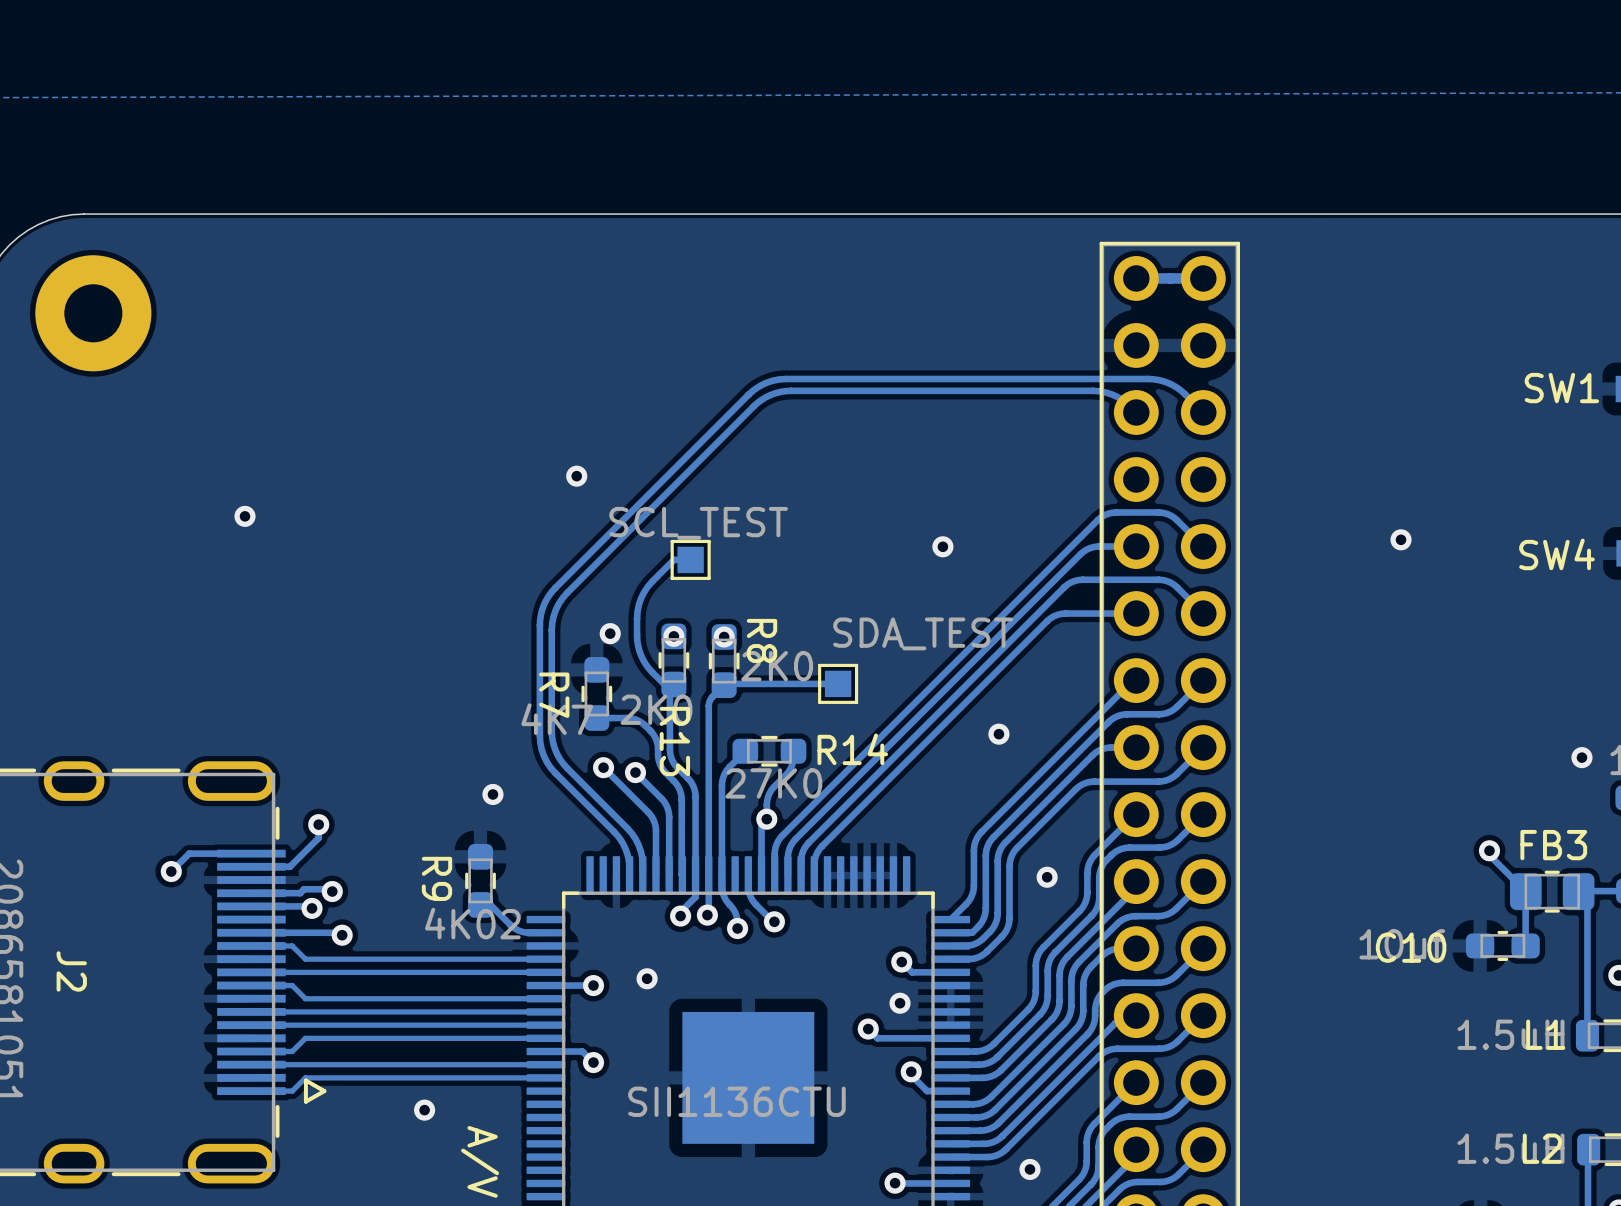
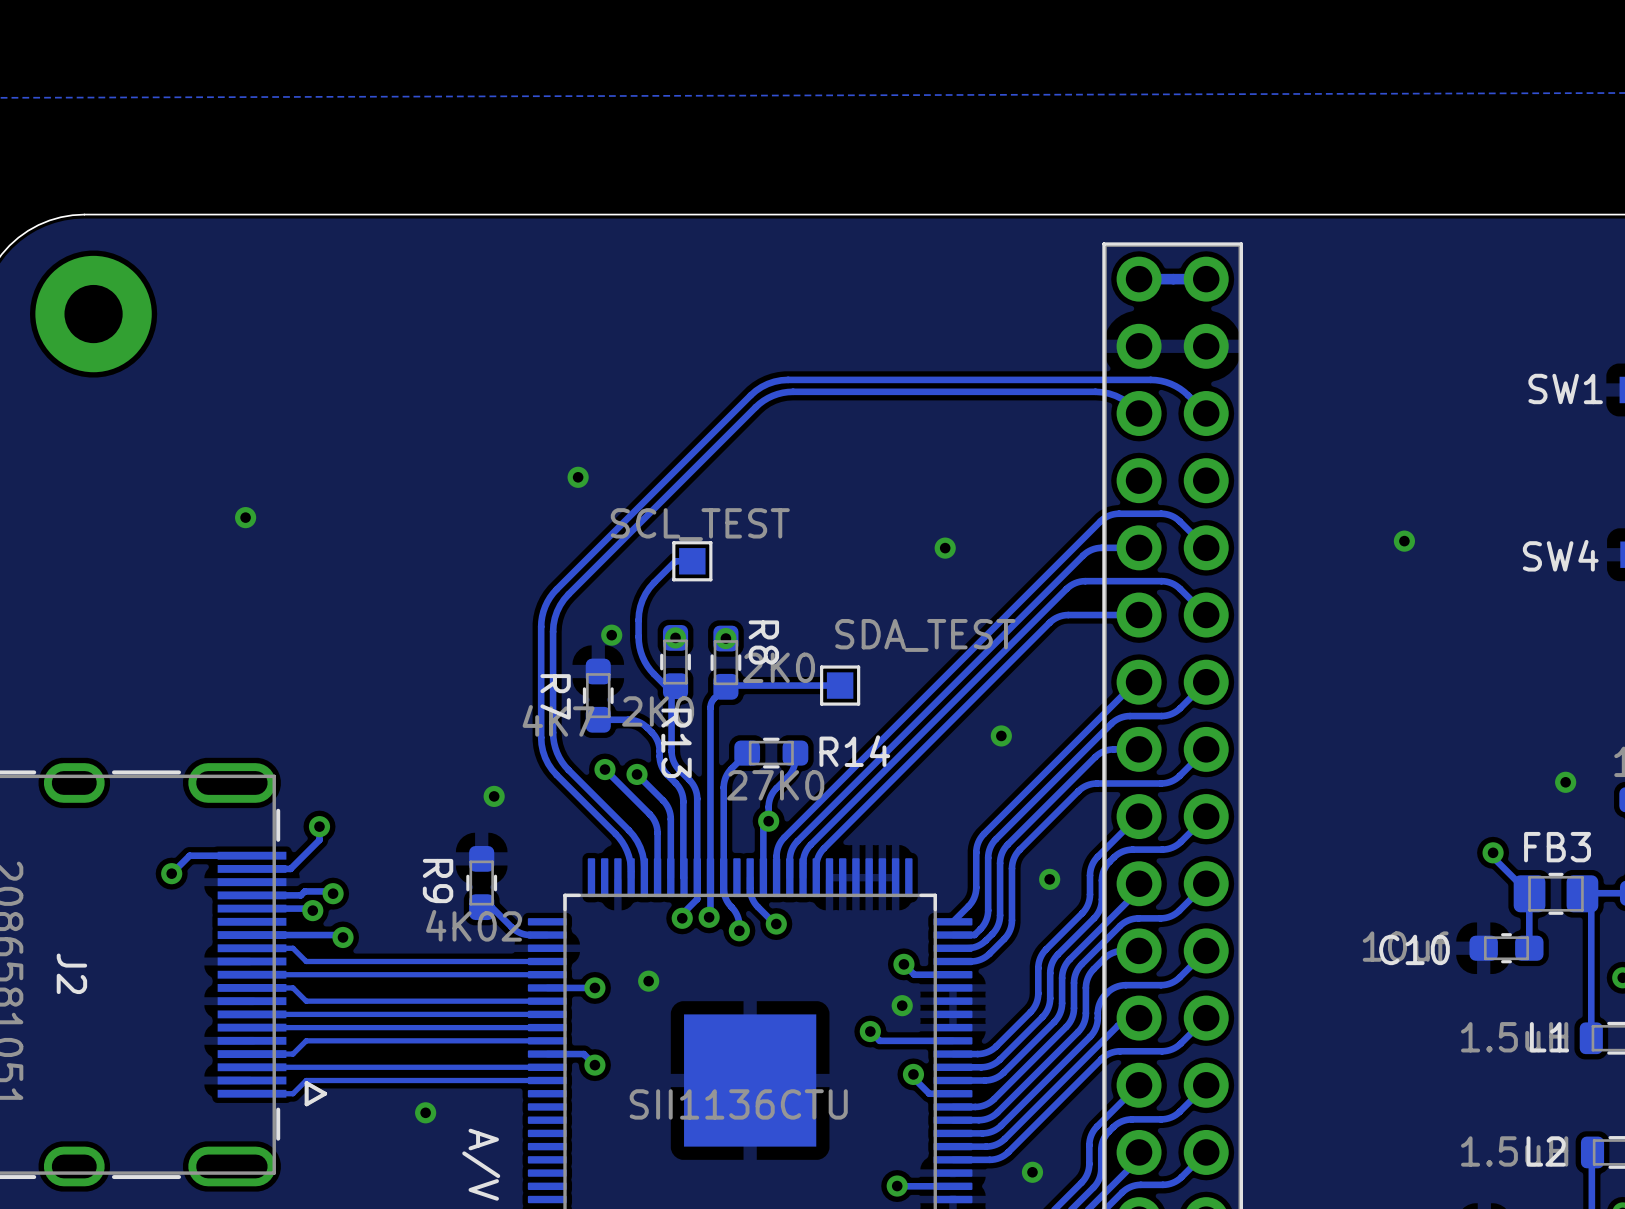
via position: (1581, 757) -> (1565, 782)

